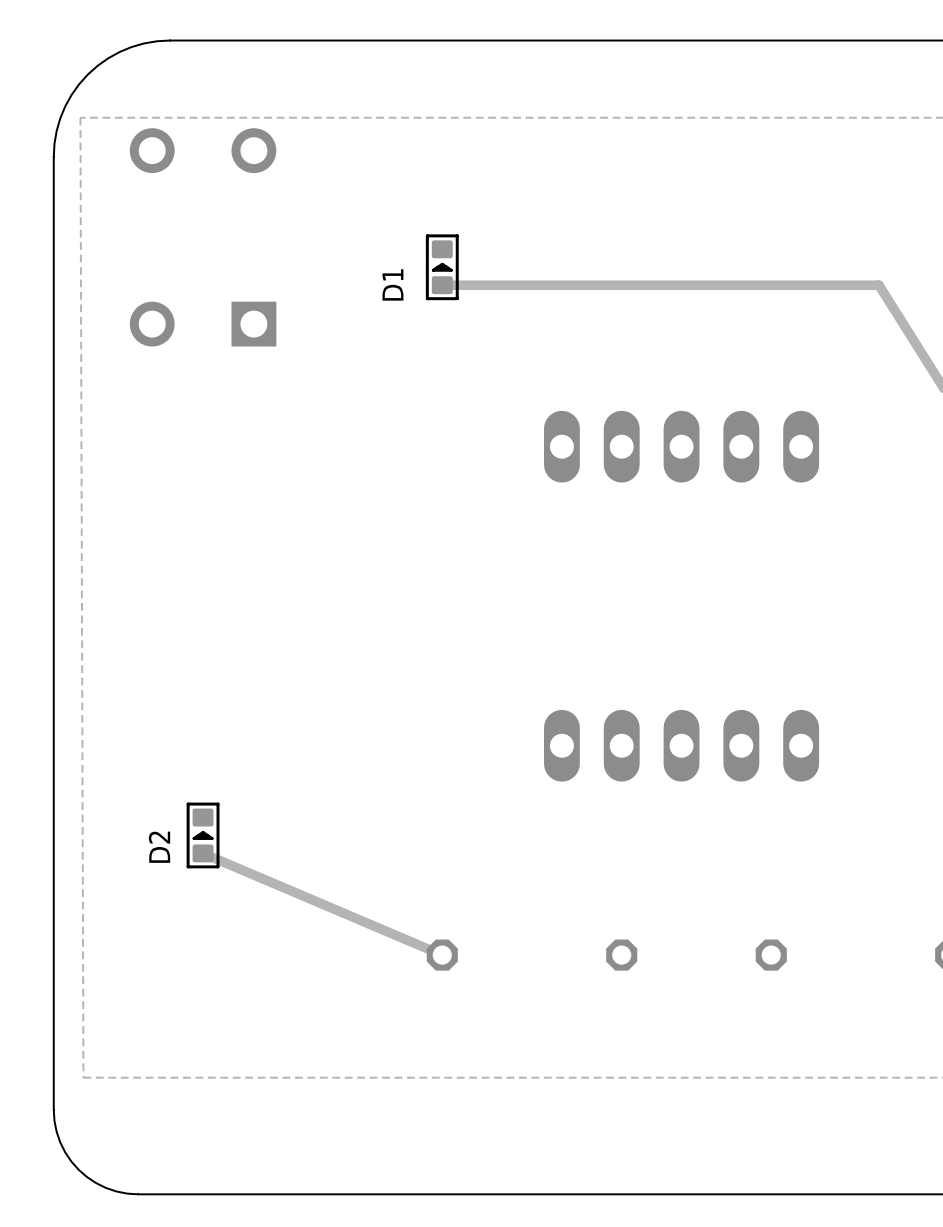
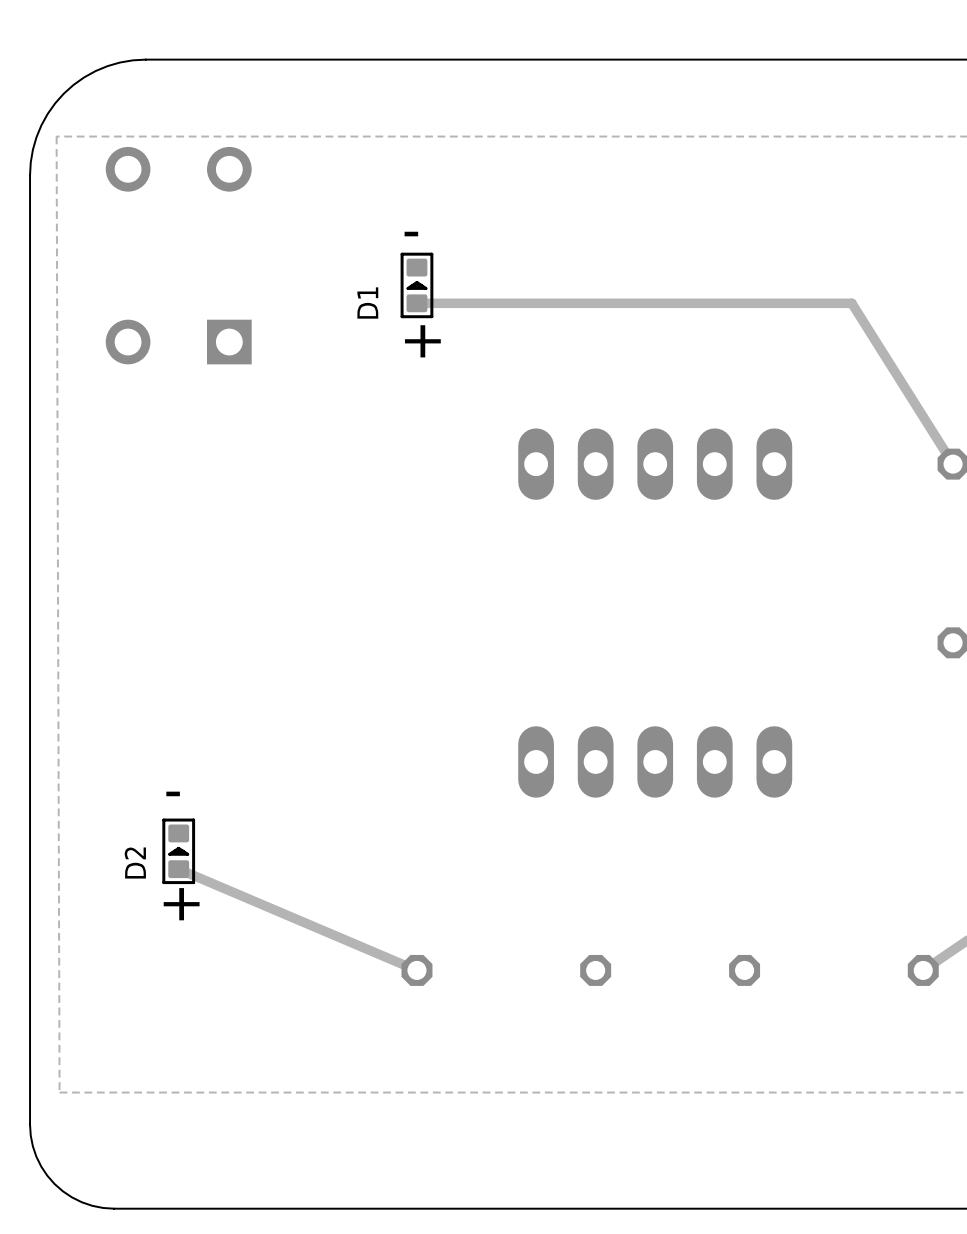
text: none -> - (411, 234)
text: none -> + (422, 341)
text: none -> - (173, 793)
text: none -> + (181, 904)

